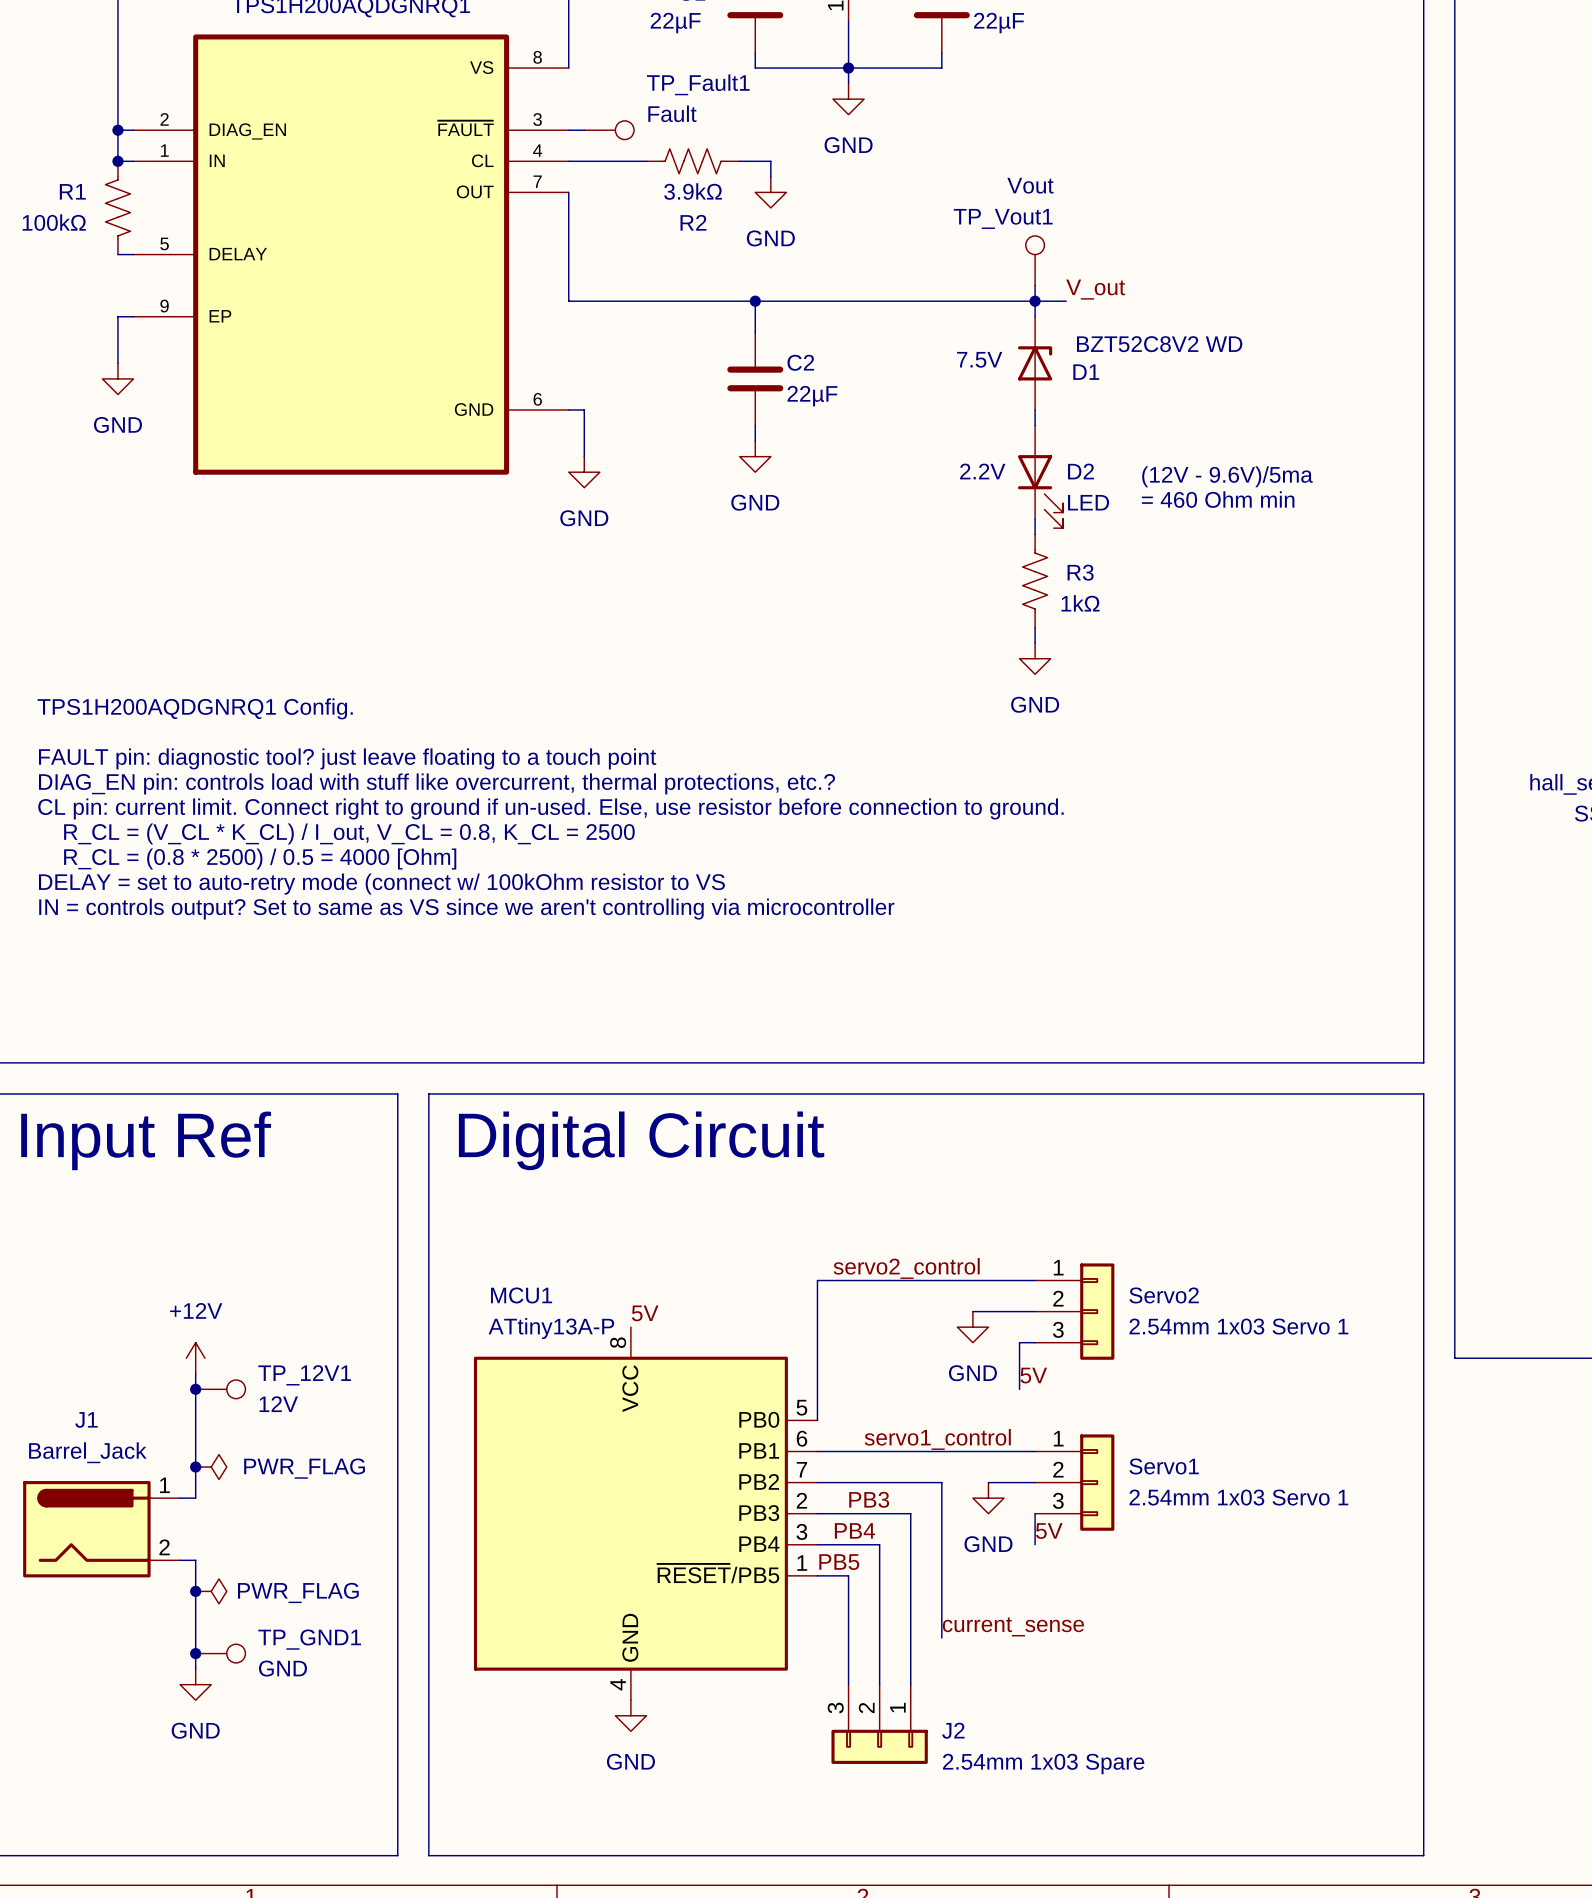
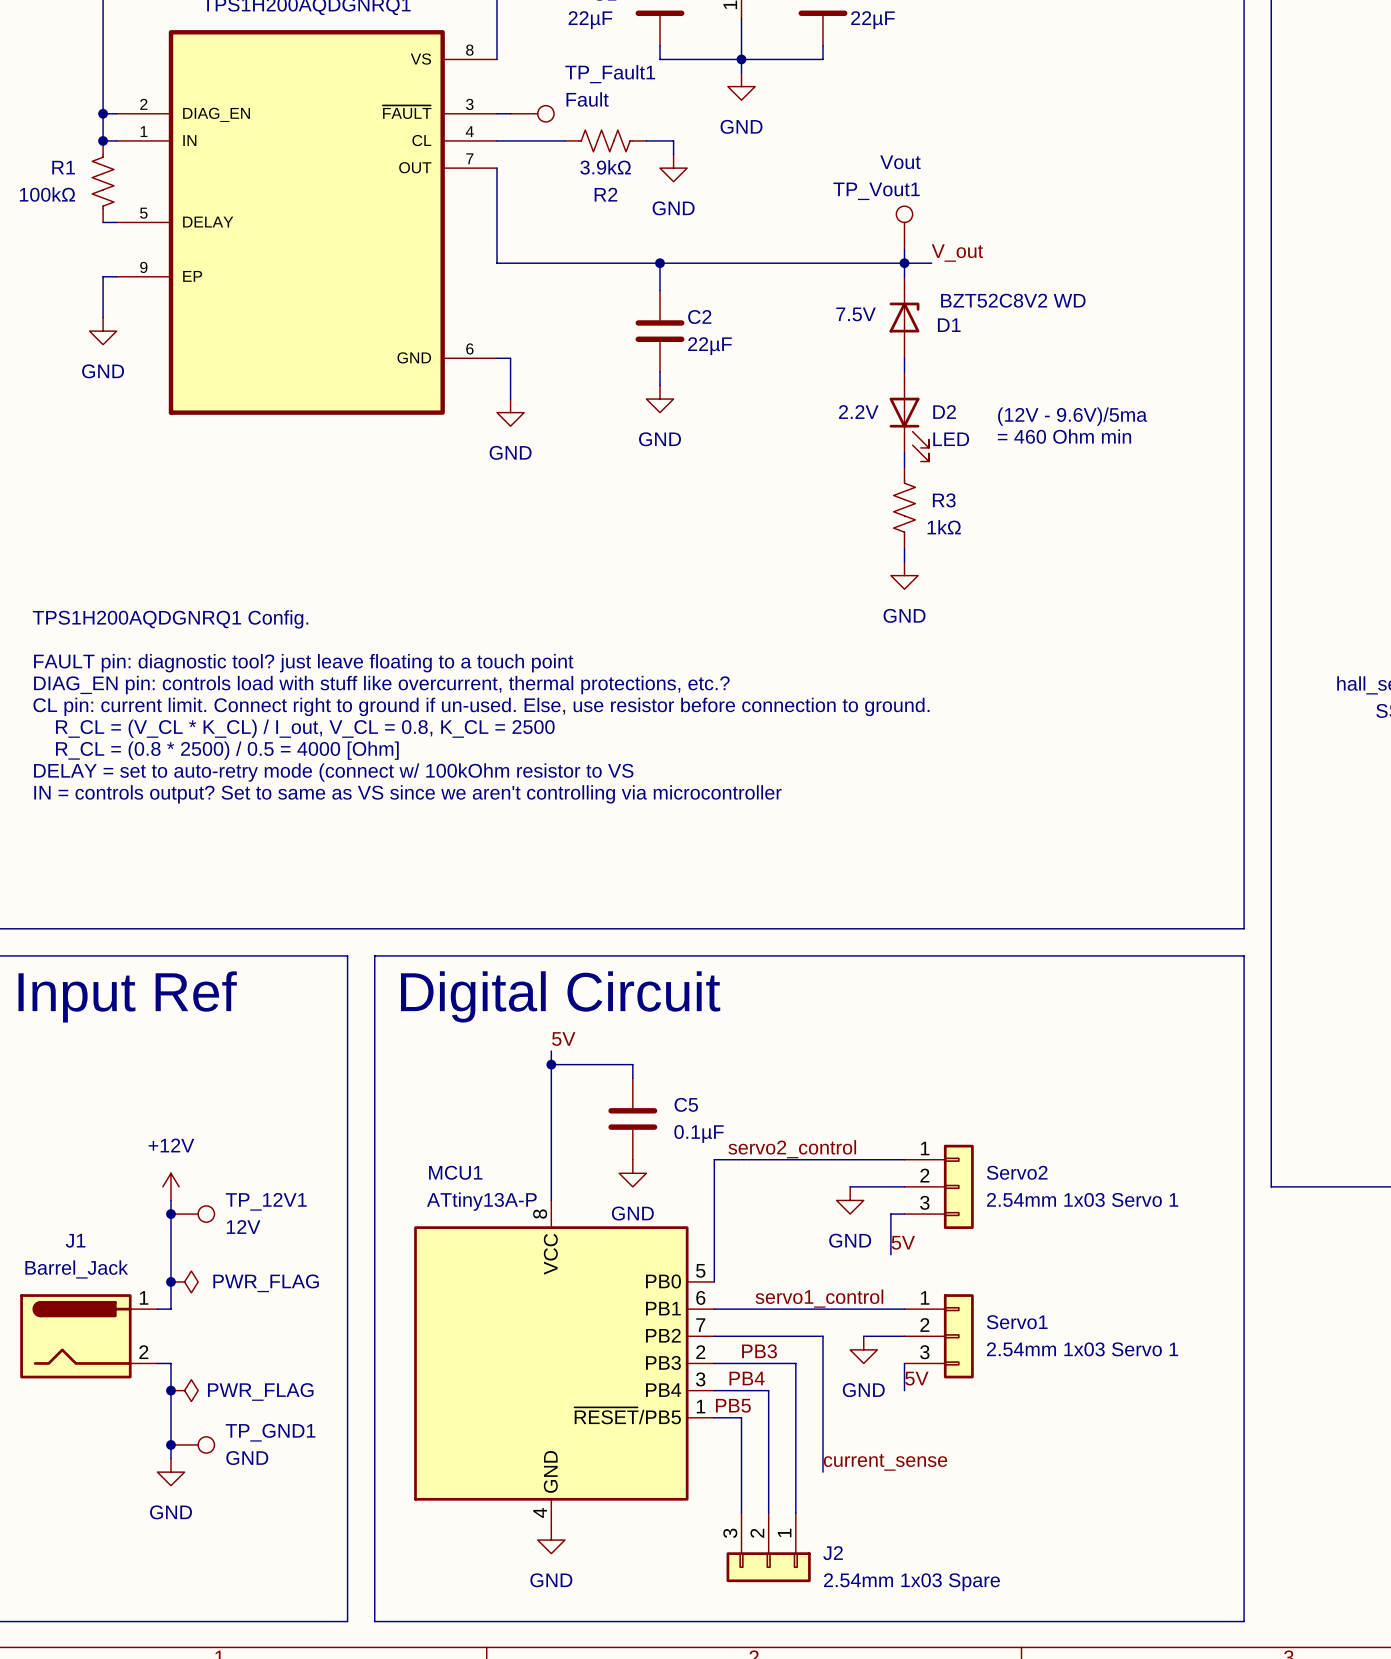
wire: none -> (551, 1051) (551, 1200)
wire: none -> (551, 1064) (632, 1064) (632, 1078)
junction: none -> (551, 1064)
label position: servo2_control (906, 1268) -> servo2_control (792, 1149)
C5: none -> 0.1µF (632, 1118)
wire: (1035, 1280) (817, 1280) (817, 1327) -> (904, 1159) (714, 1159)
wire: (972, 1311) (1035, 1311) -> (850, 1186) (904, 1186)
Servo2 position: (1074, 1311) -> (939, 1186)
label position: 5V (645, 1313) -> 5V (563, 1039)
power symbol position: GND (972, 1327) -> GND (850, 1200)
power symbol: none -> GND (632, 1173)
wire: (1035, 1342) (1019, 1342) (1019, 1389) -> (904, 1214) (890, 1214) (890, 1254)
label position: 5V (1033, 1375) -> 5V (903, 1242)
wire: none -> (714, 1241) (714, 1281)
label position: servo1_control (937, 1439) -> servo1_control (819, 1298)
wire: (817, 1451) (1035, 1451) -> (714, 1309) (904, 1309)
wire: (817, 1482) (941, 1482) (941, 1529) -> (714, 1336) (823, 1336)
wire: (988, 1482) (1035, 1482) -> (863, 1336) (904, 1336)
Servo1 position: (1074, 1482) -> (939, 1336)
power symbol position: GND (988, 1498) -> GND (863, 1349)
label position: PB3 (869, 1499) -> PB3 (759, 1351)
MCU1 position: (645, 1513) -> (564, 1363)
wire: (817, 1513) (910, 1513) (910, 1560) -> (714, 1363) (795, 1363)
wire: (1035, 1513) (1035, 1544) -> (904, 1363) (904, 1390)
label position: PB4 (854, 1530) -> PB4 (747, 1378)
label position: 5V (1049, 1531) -> 5V (916, 1378)
wire: (817, 1544) (879, 1544) (879, 1591) -> (714, 1390) (768, 1390)
label position: PB5 (839, 1562) -> PB5 (733, 1405)
wire: (817, 1575) (848, 1575) (848, 1622) -> (714, 1417) (741, 1417)
label position: current_sense (1013, 1626) -> current_sense (885, 1462)
wire: none -> (823, 1431) (823, 1472)
power symbol position: GND (630, 1715) -> GND (551, 1540)
J2 position: (879, 1724) -> (768, 1547)

